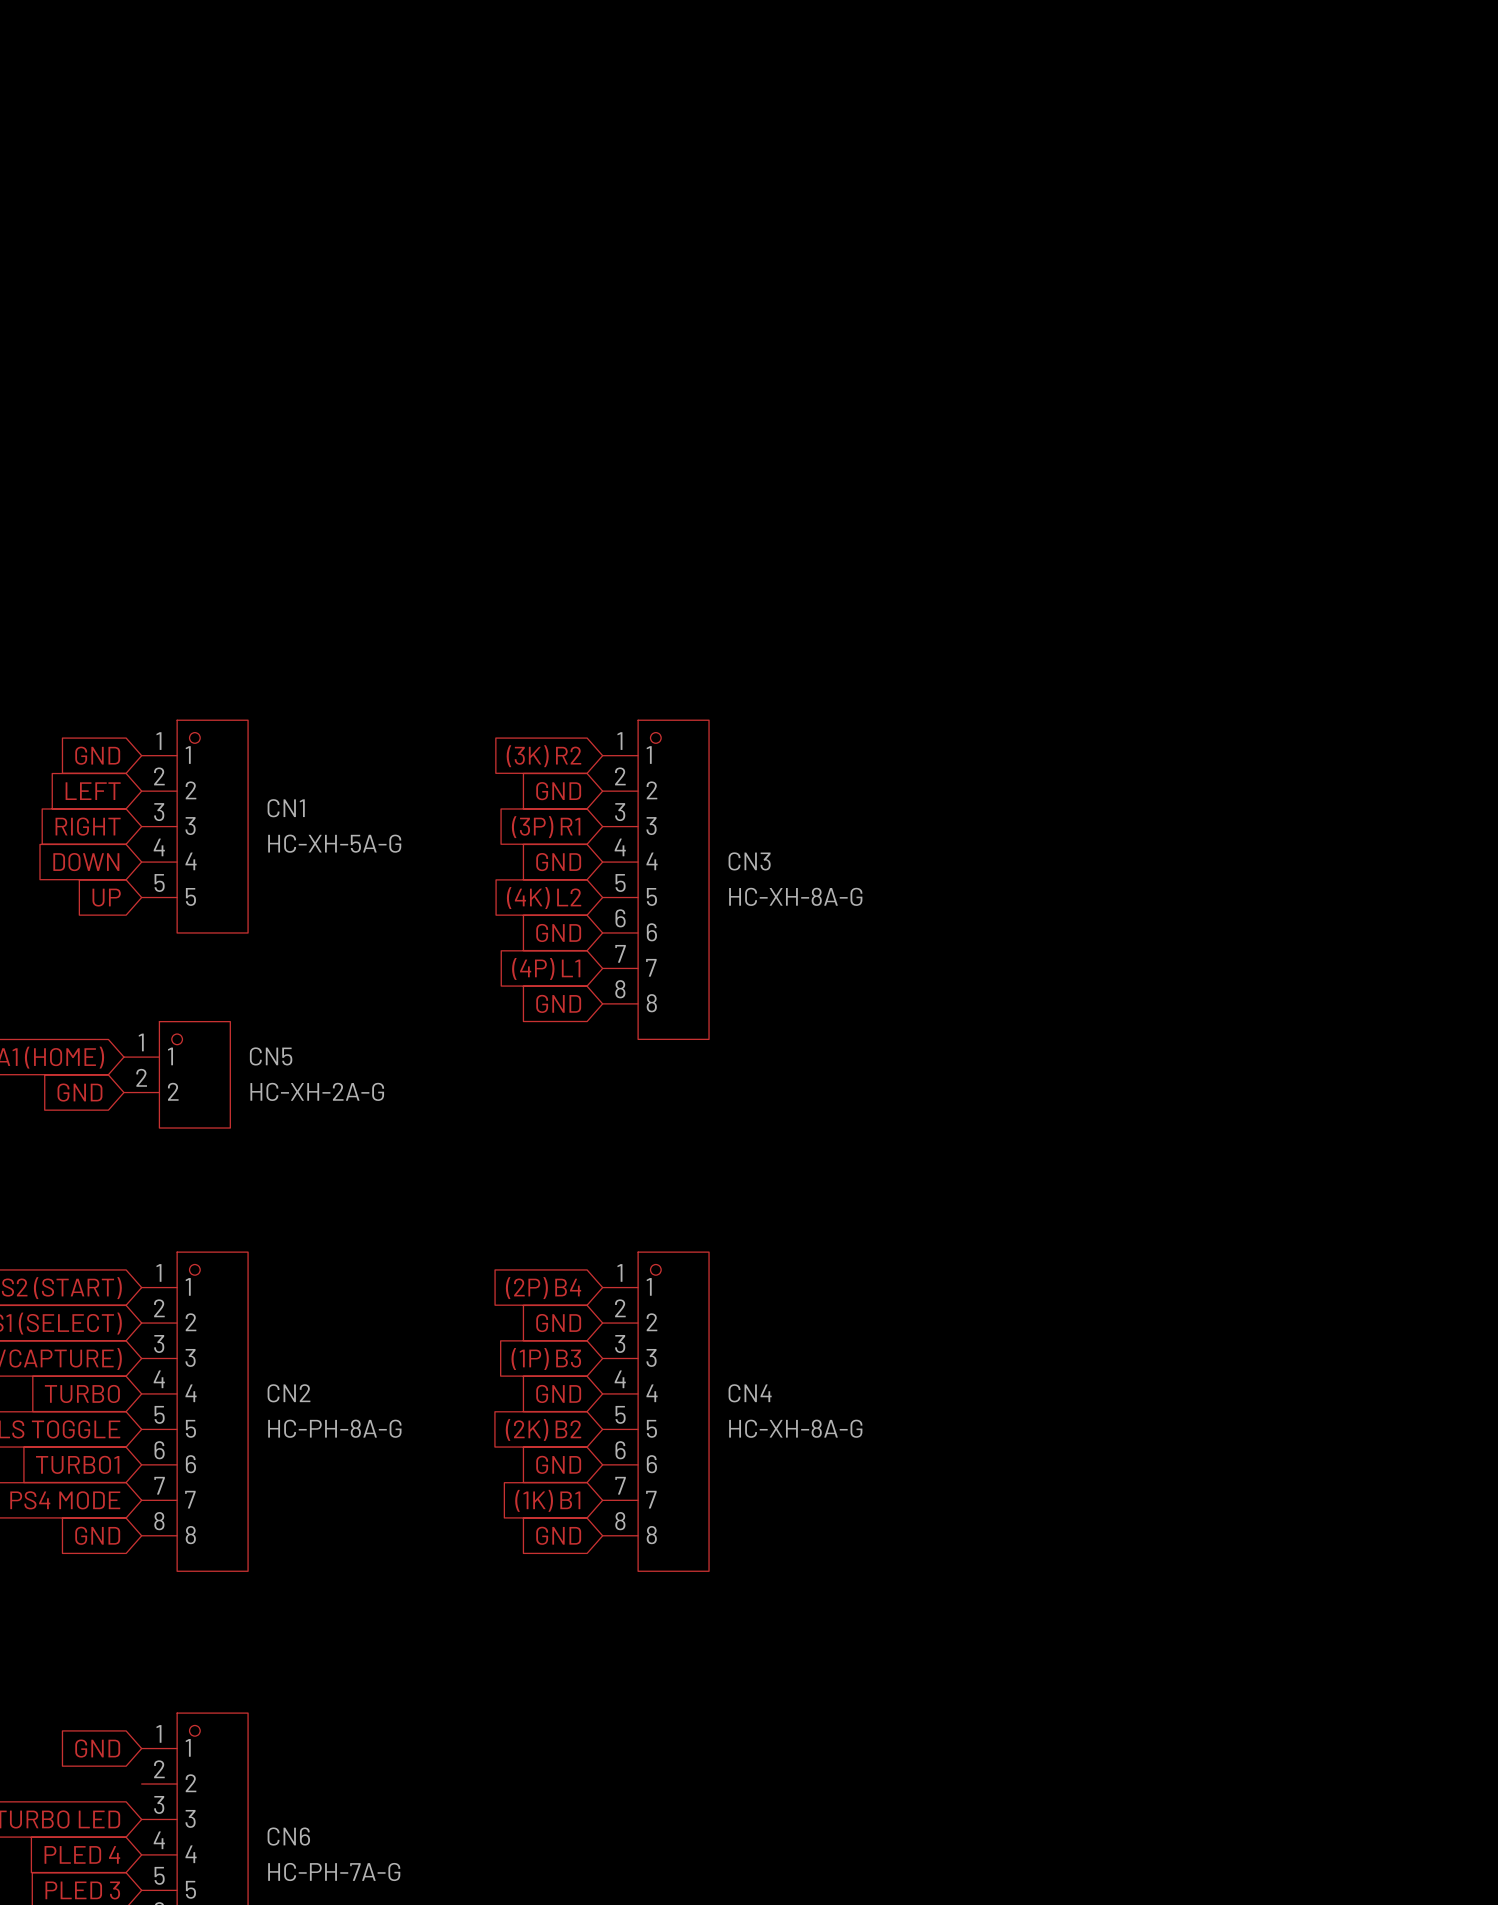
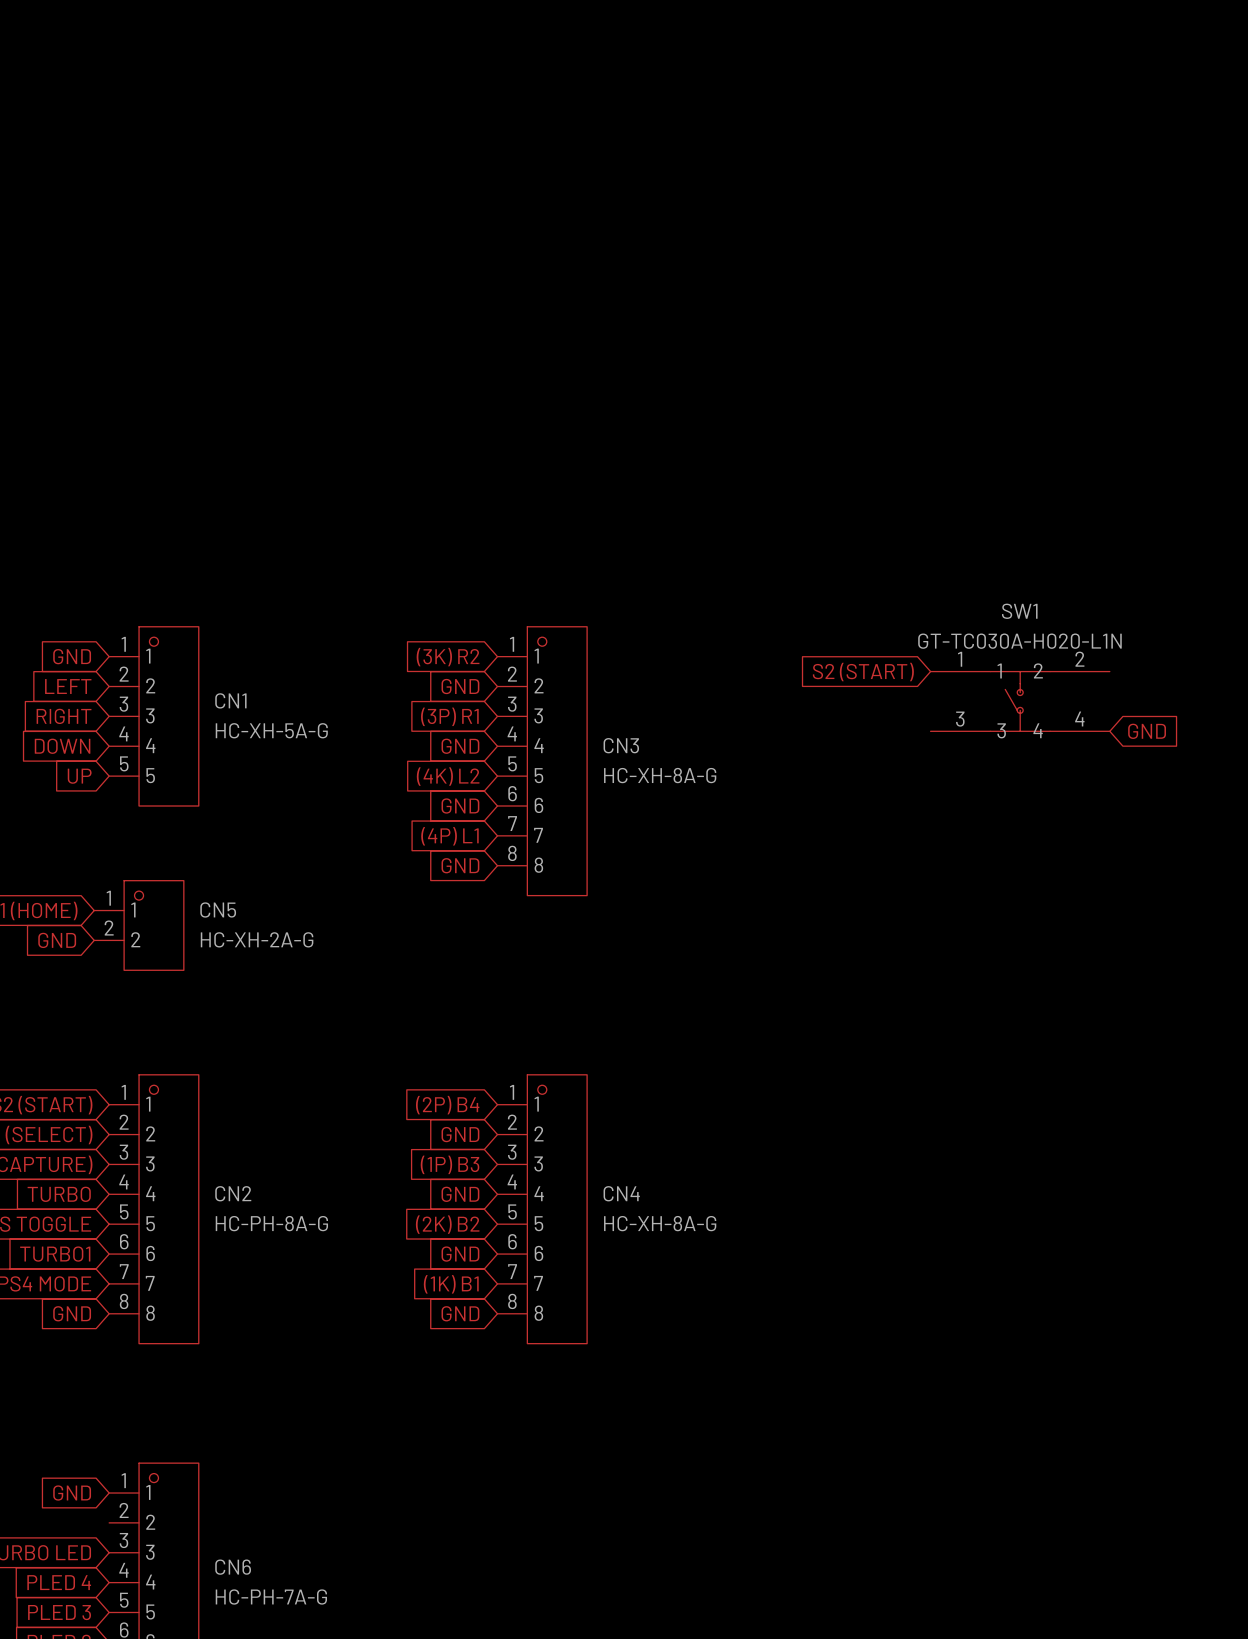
global label: none -> S2 (START) (863, 672)
SW1: none -> GT-TC030A-H020-L1N (1020, 701)
global label: none -> GND (1147, 731)

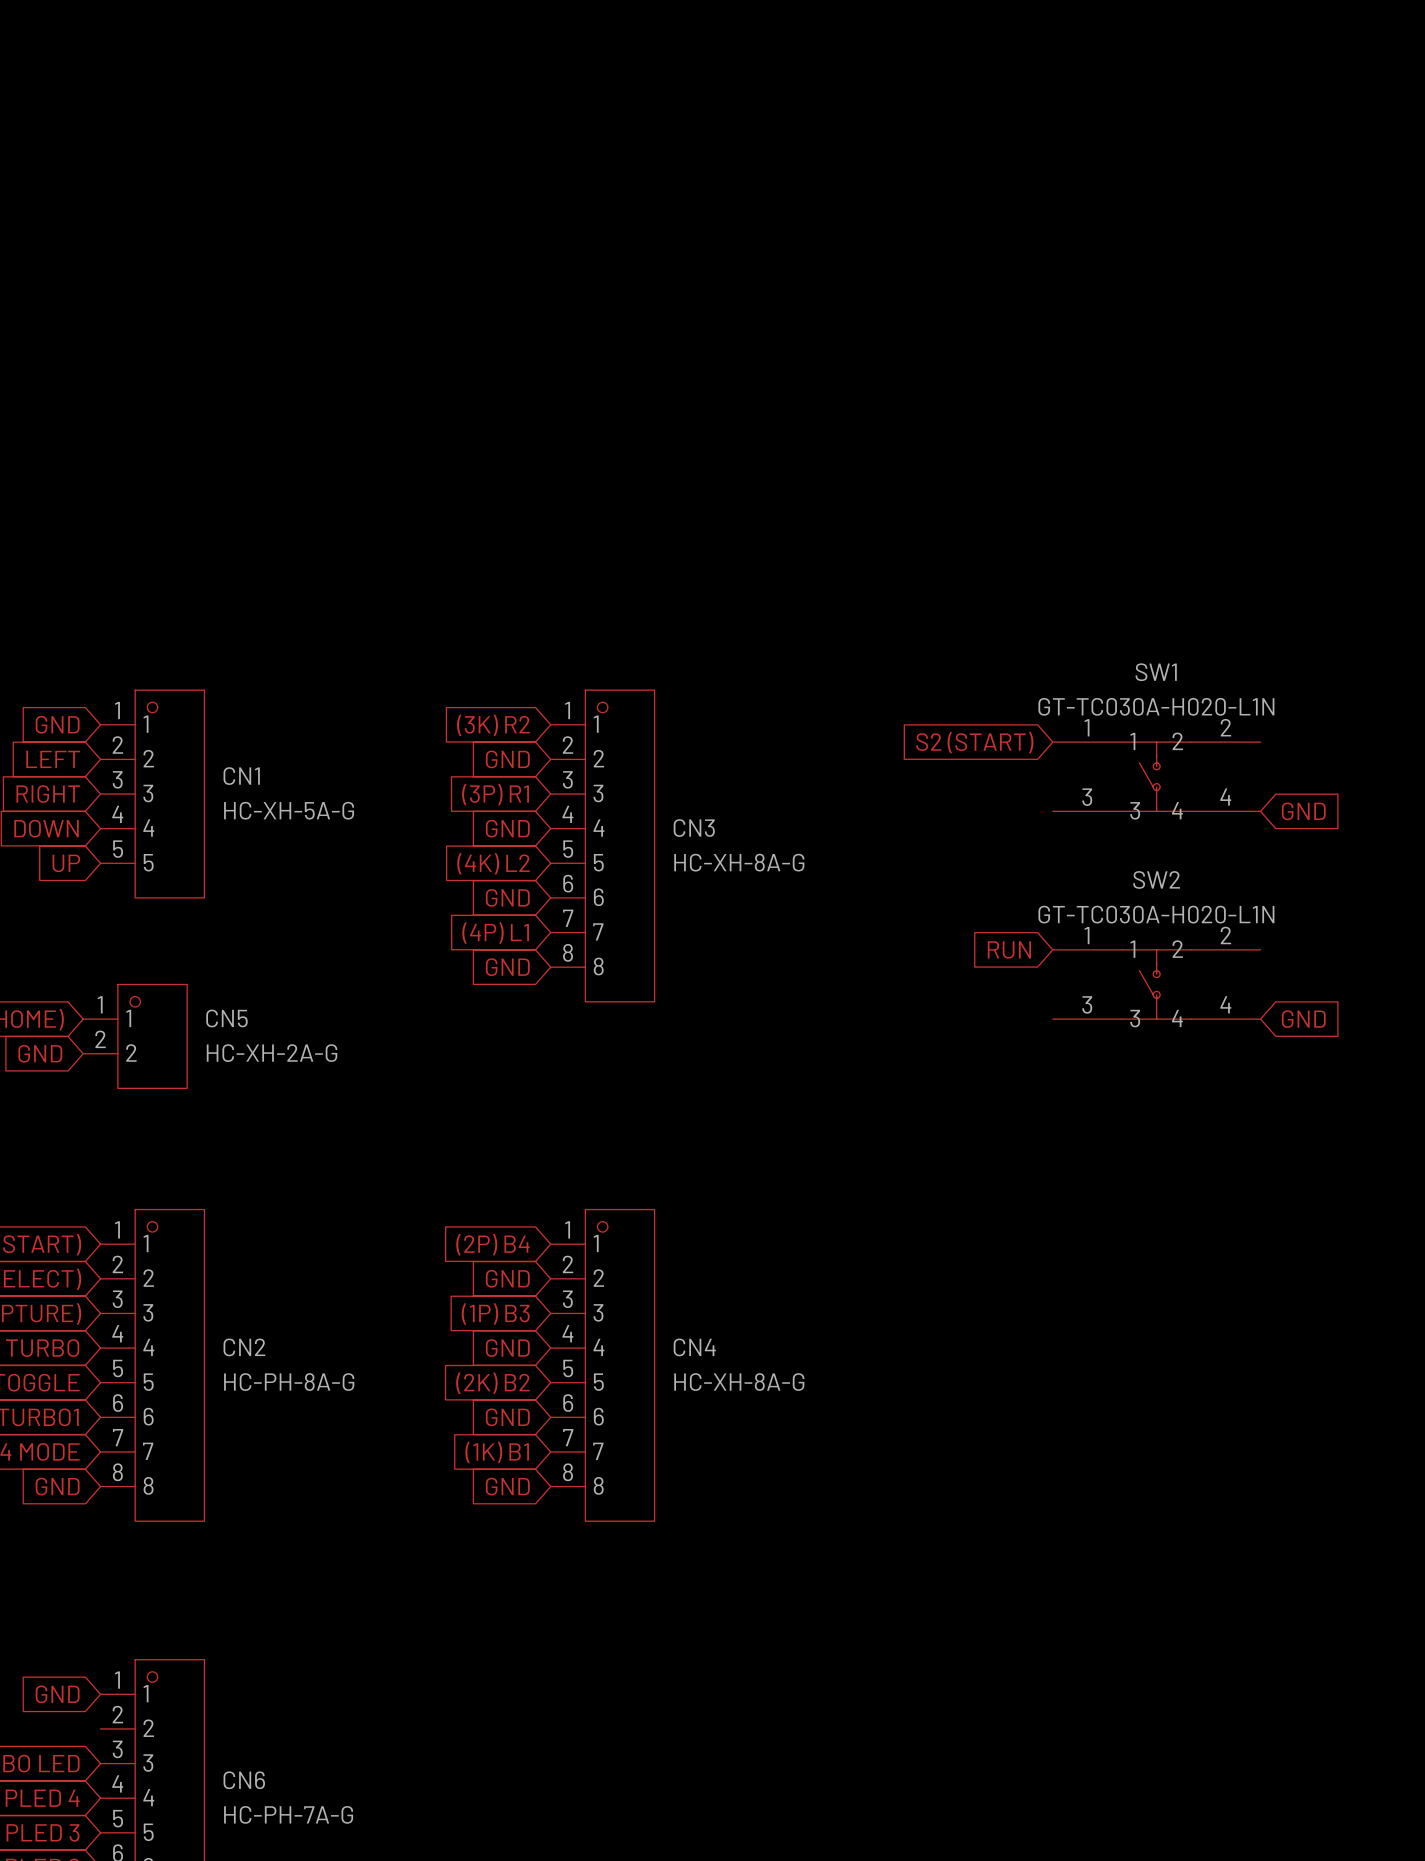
global label: none -> RUN (1009, 949)
SW2: none -> GT-TC030A-H020-L1N (1156, 984)
global label: none -> GND (1303, 1019)

